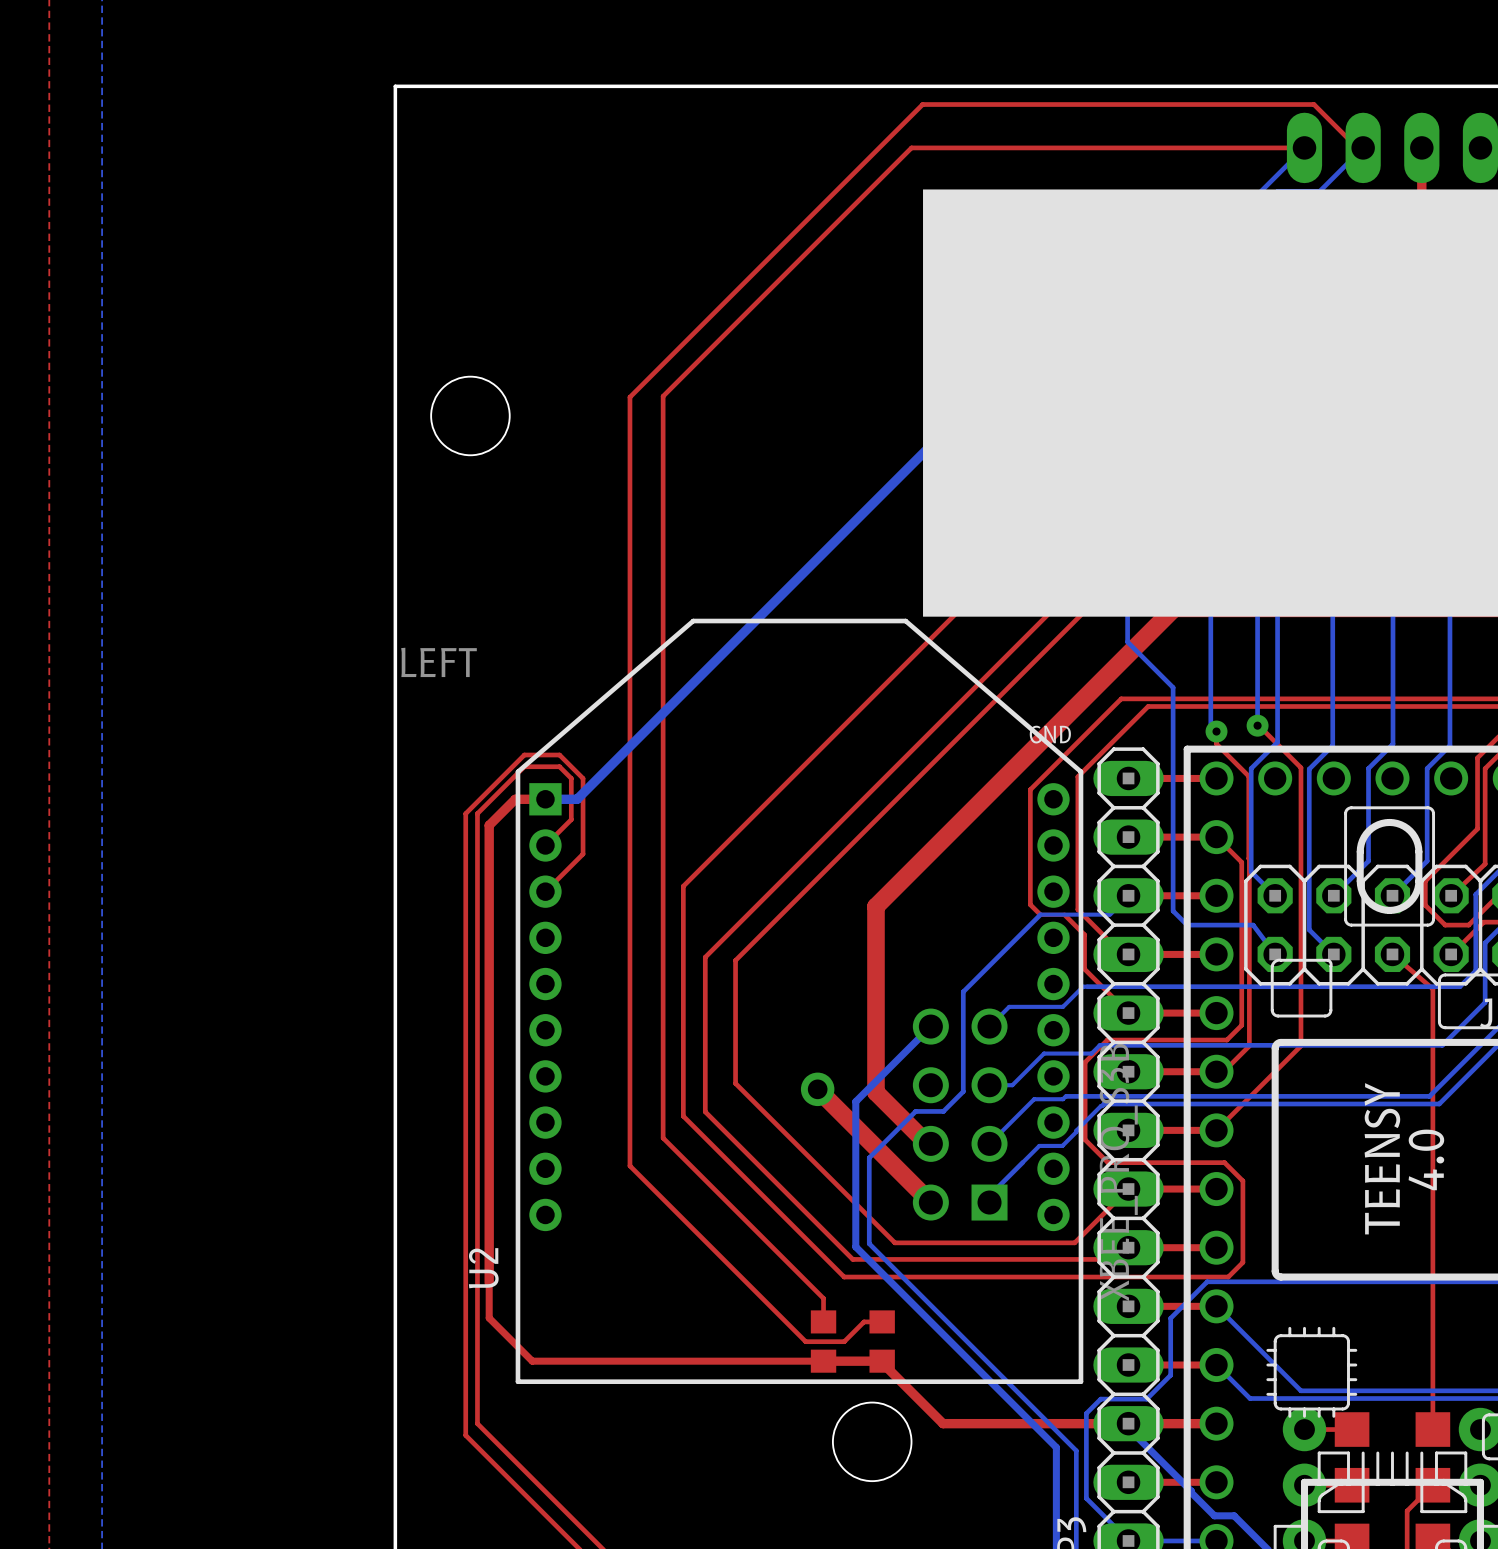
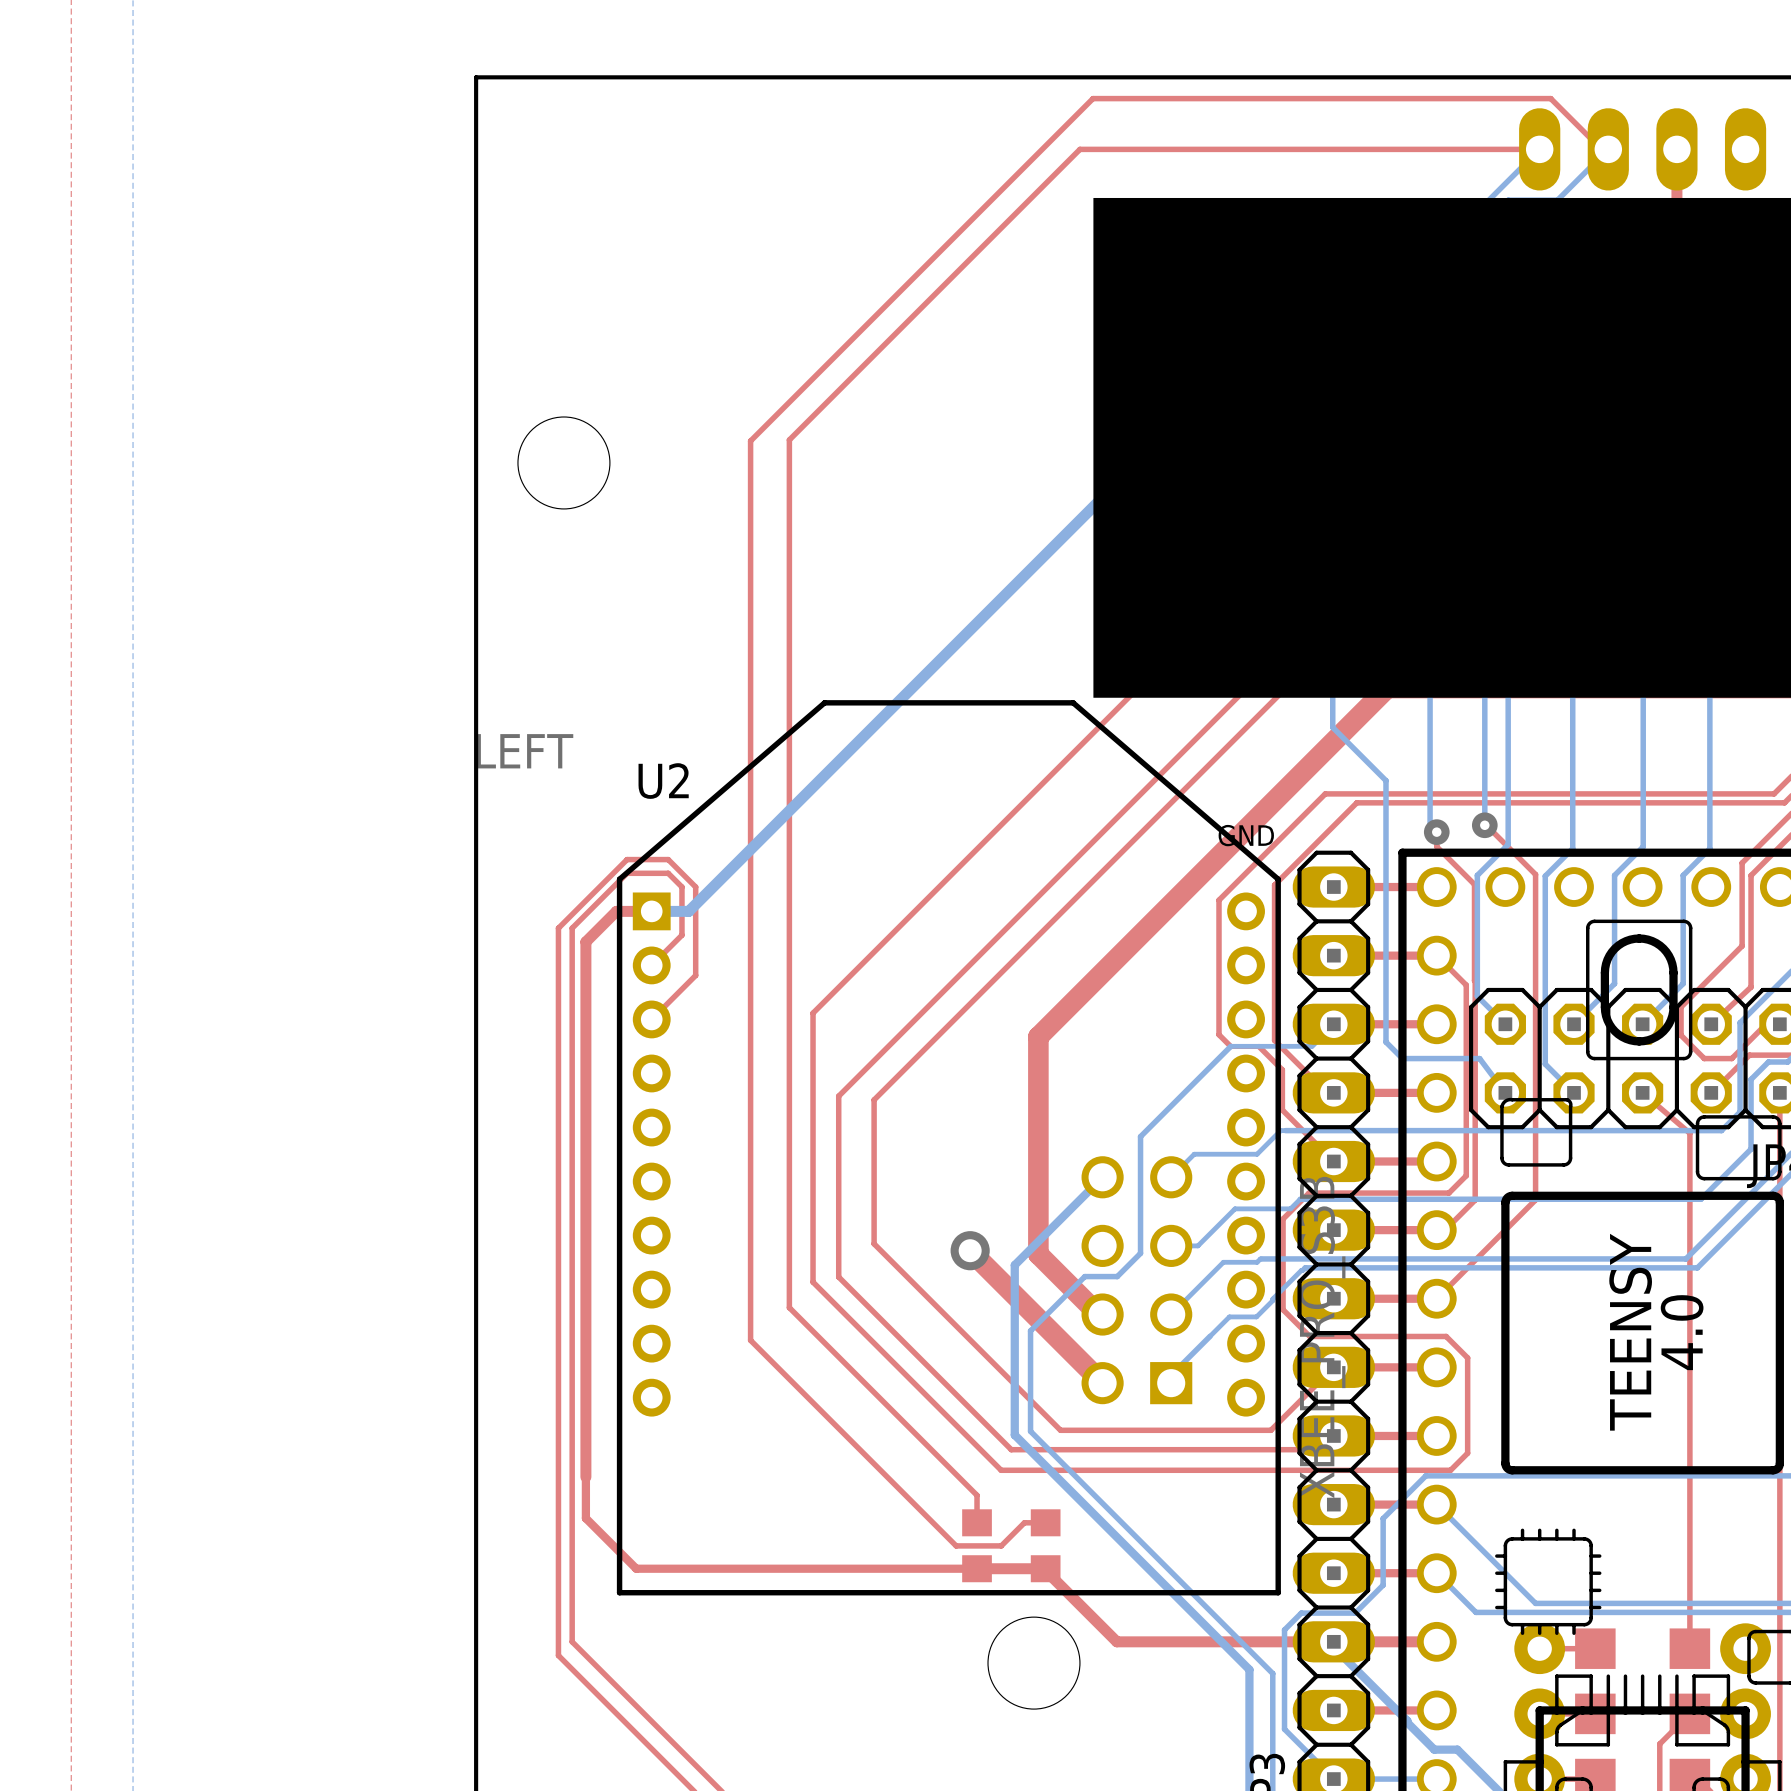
U2 name rotation: 0° (483, 1268) -> 90° clockwise (663, 781)
U2 name position: U2 (483, 1268) -> U2 (663, 781)

